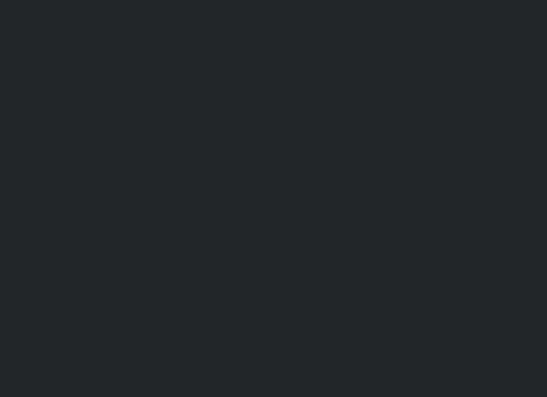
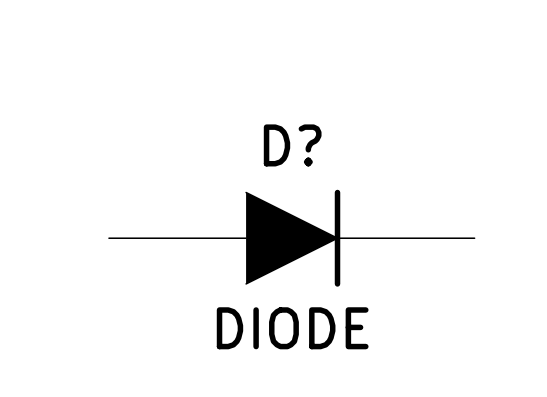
D?: none -> DIODE (291, 238)

